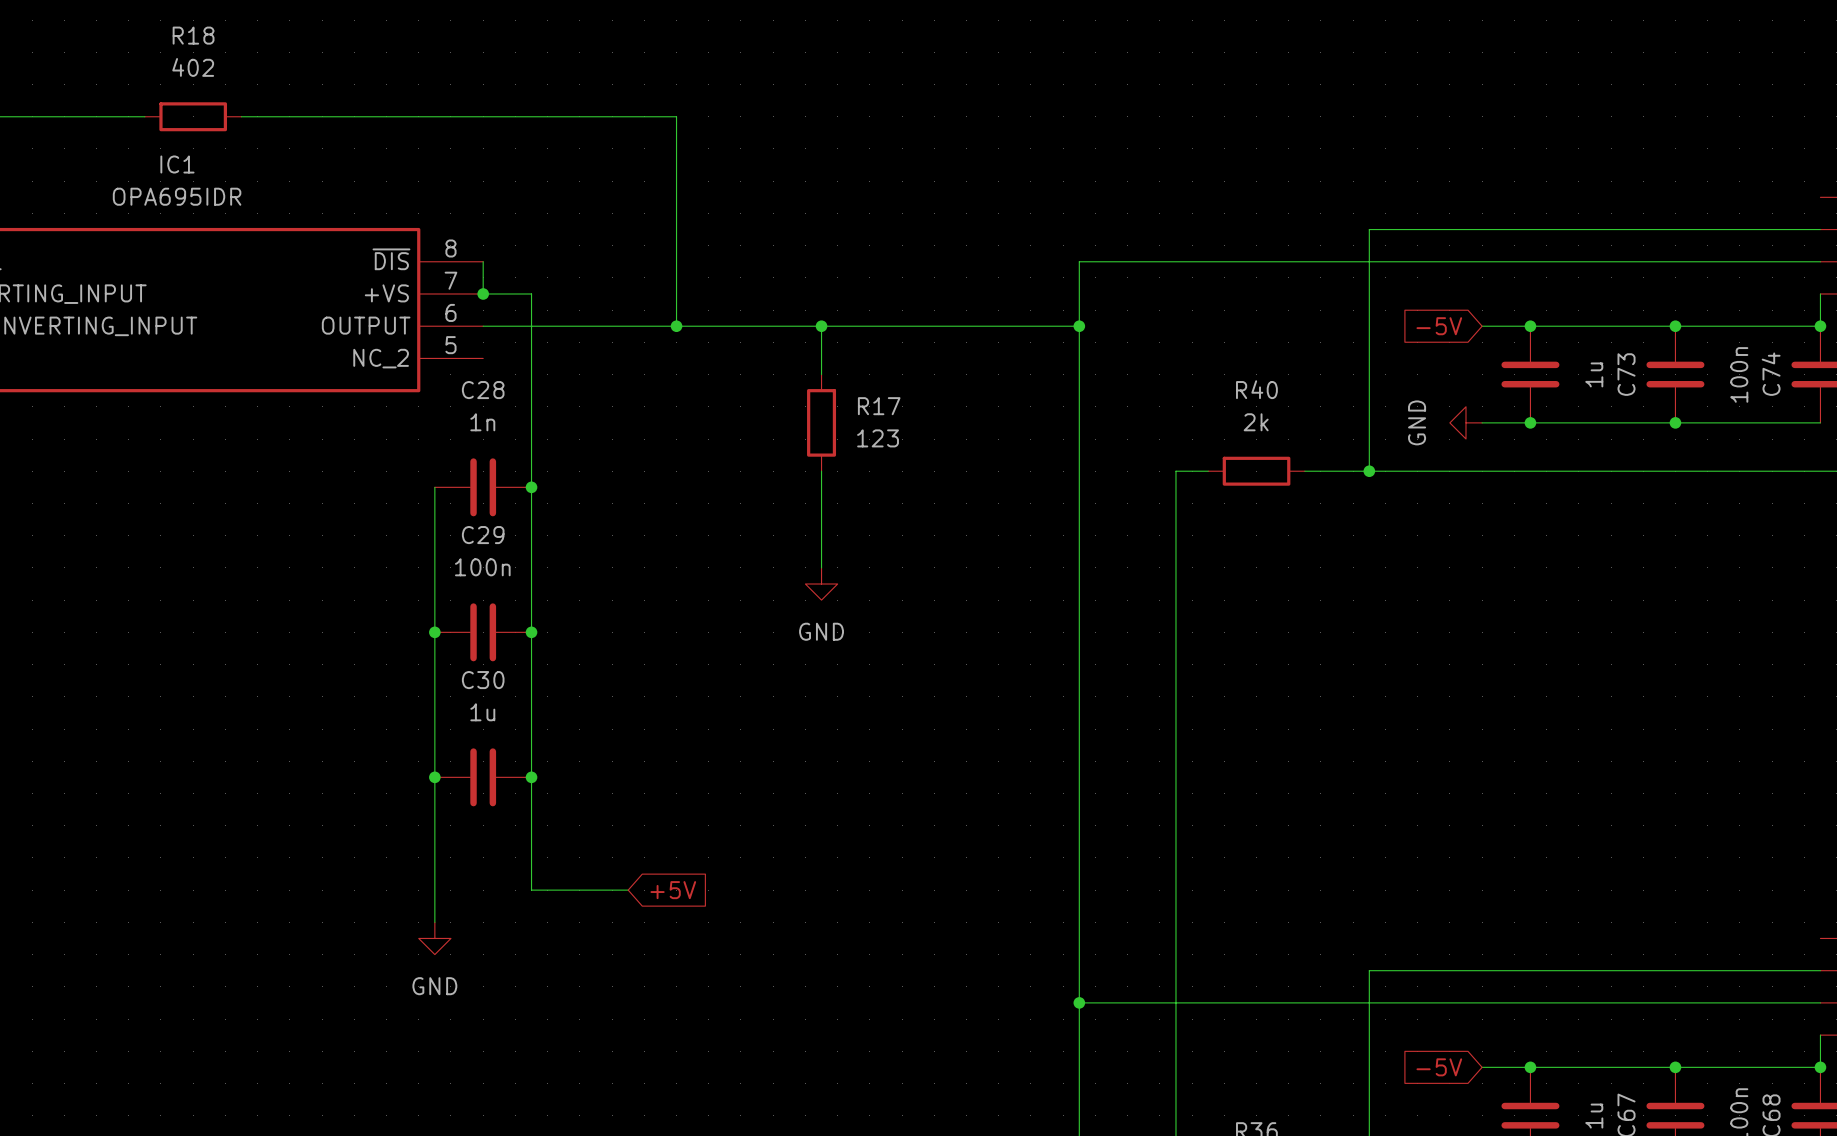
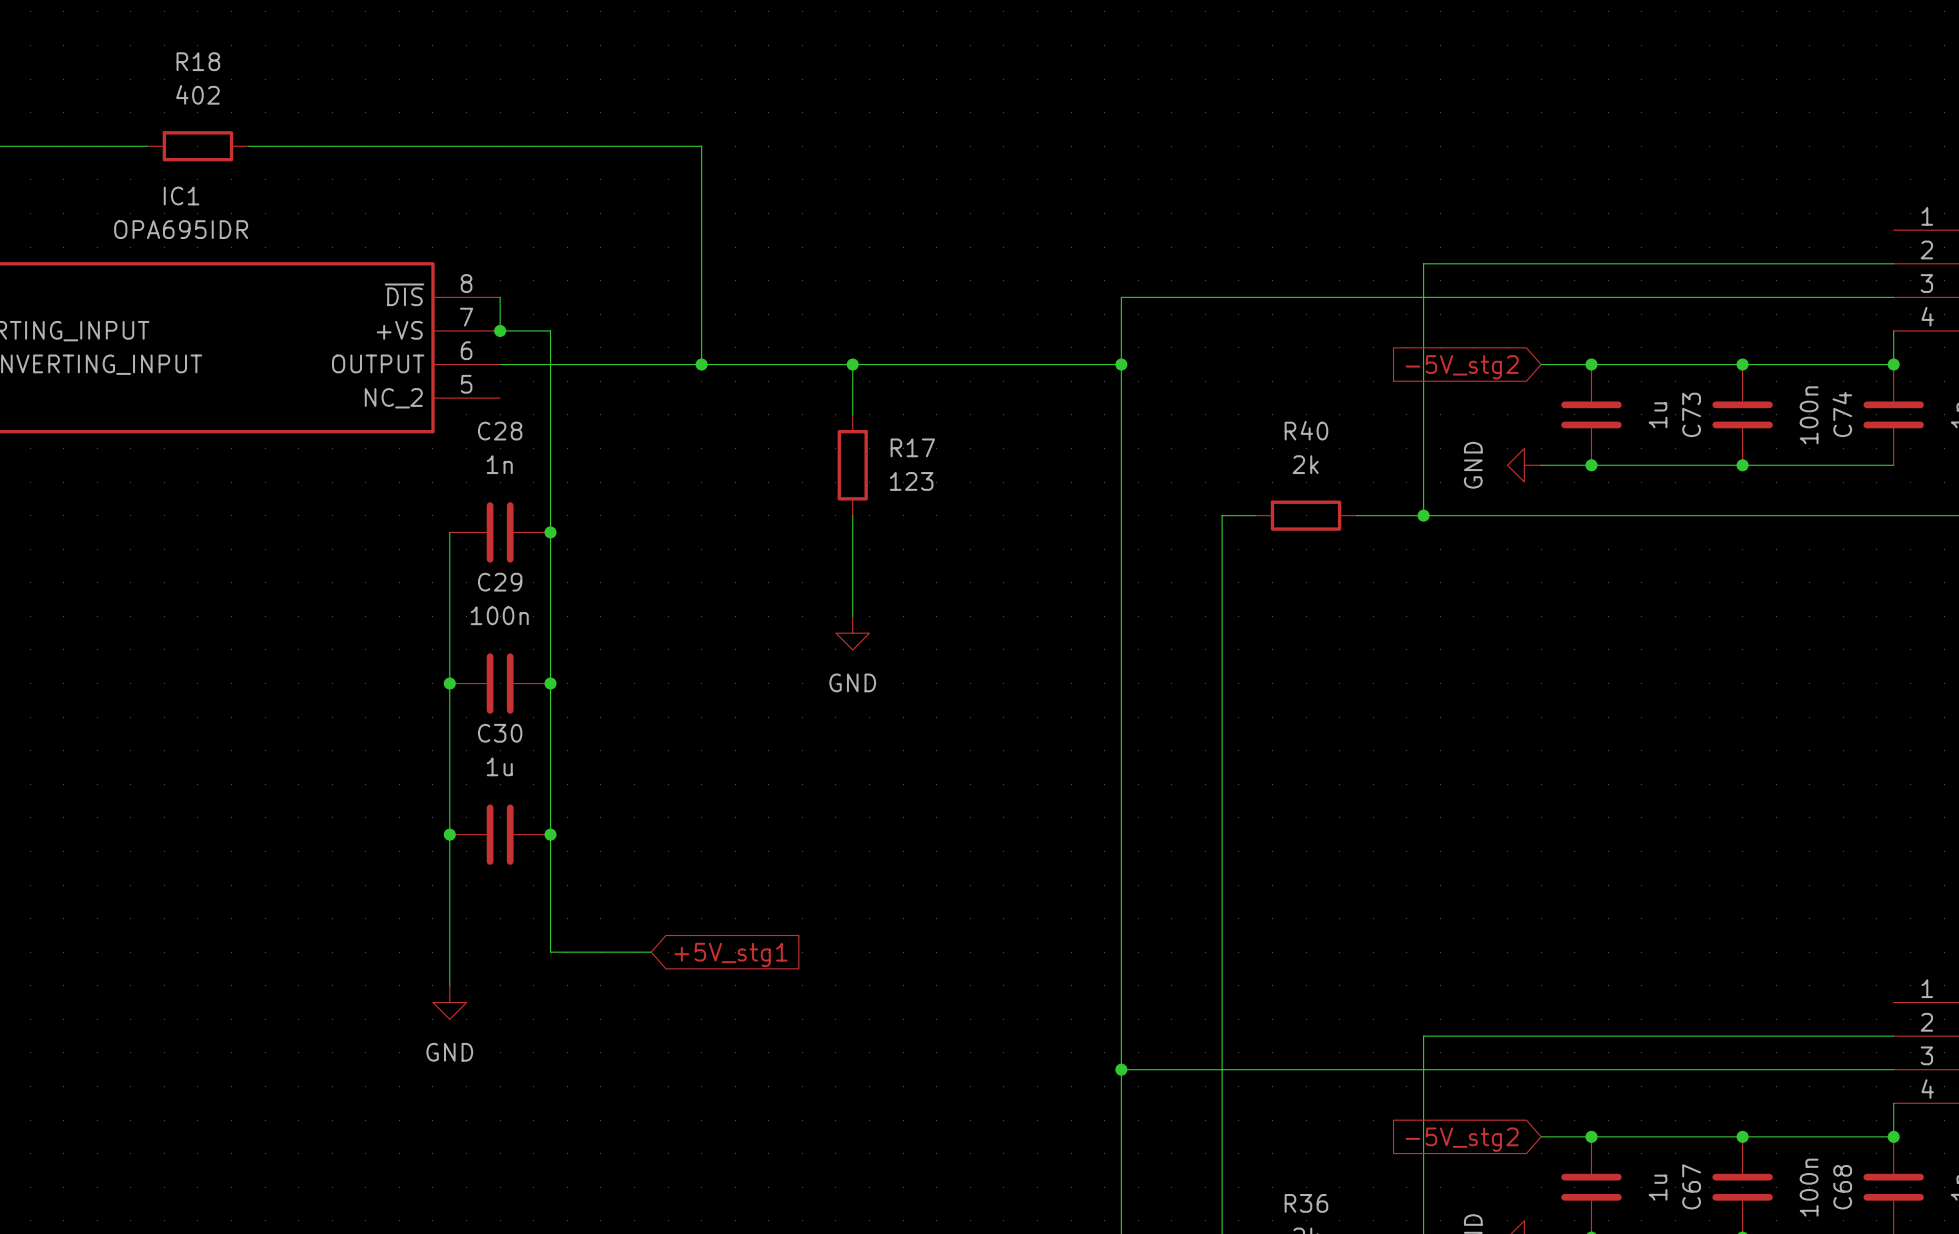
global label: -5V (1439, 326) -> -5V_stg2 (1462, 367)
global label: +5V (673, 890) -> +5V_stg1 (731, 954)
global label: -5V (1439, 1067) -> -5V_stg2 (1462, 1139)

